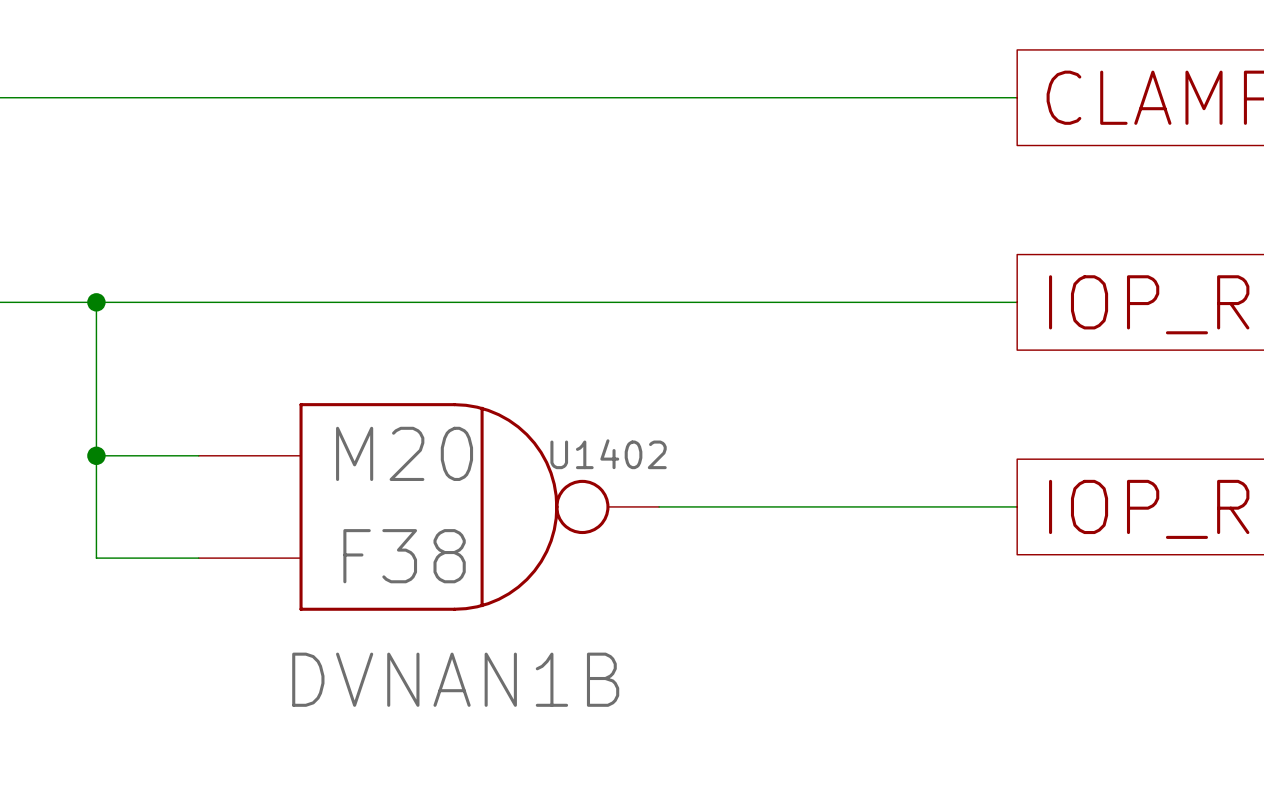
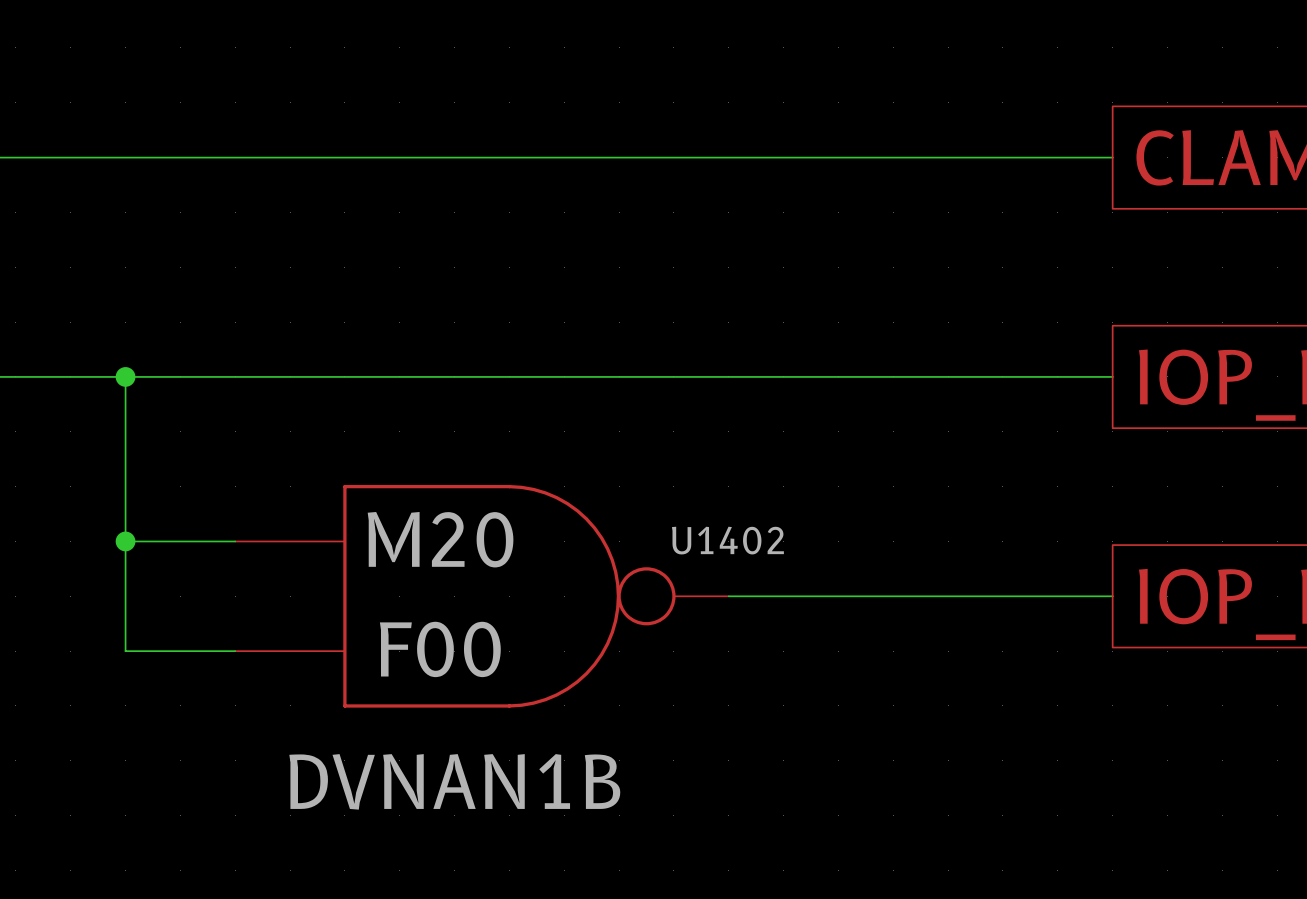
U1402 symbol: [198, 403, 660, 611] -> [235, 484, 729, 708]
U1402 name position: U1402 (608, 454) -> U1402 (727, 540)
U1402 value: F38 (404, 556) -> F00 (440, 649)
U1402 text position: DVNAN1B (455, 679) -> DVNAN1B (454, 781)

